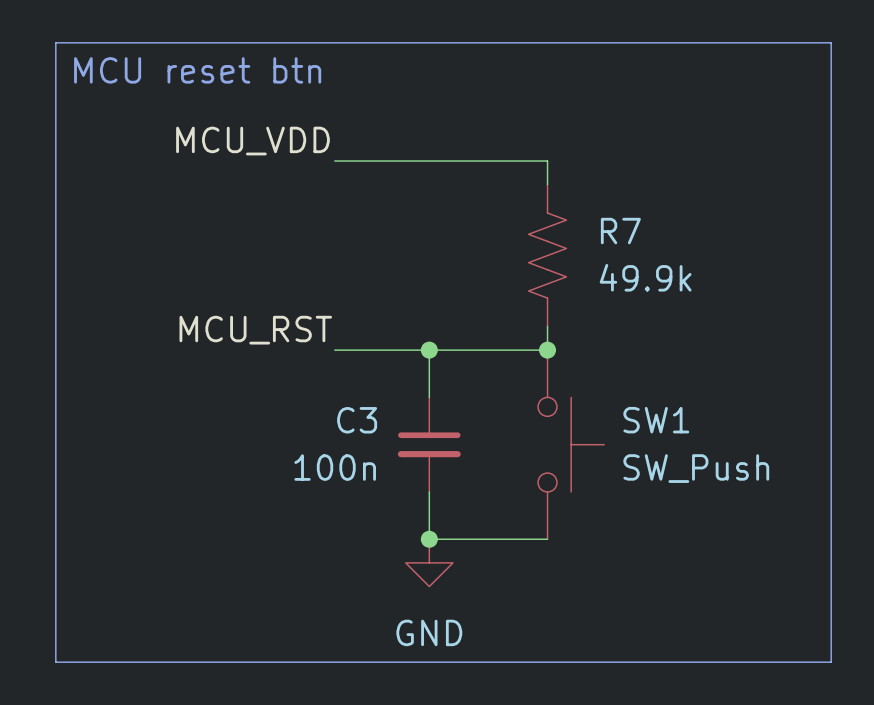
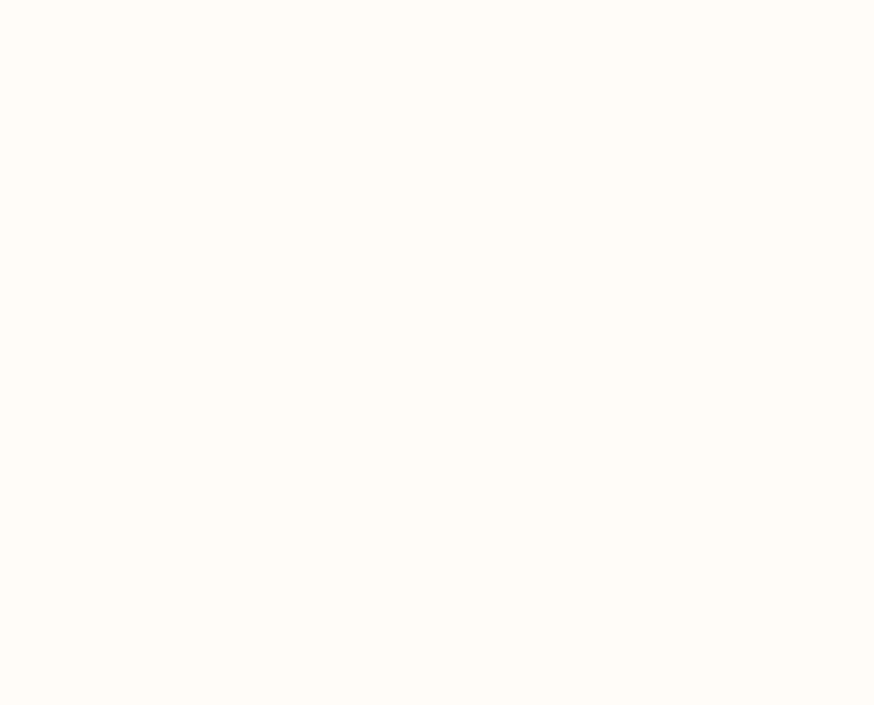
line: (55, 42) (831, 42) (831, 662) (55, 662) (55, 42) -> none
text: MCU reset btn (197, 70) -> none
label: MCU_VDD (252, 141) -> none
wire: (334, 161) (547, 161) (547, 184) -> none
R7: 49.9k (547, 255) -> none
wire: (547, 326) (547, 350) (334, 350) -> none
label: MCU_RST (255, 330) -> none
wire: (429, 350) (429, 397) -> none
junction: (429, 350) -> none
junction: (547, 350) -> none
C3: 100n (429, 444) -> none
SW1: SW_Push (571, 444) -> none
wire: (429, 491) (429, 539) (547, 539) -> none
junction: (429, 539) -> none
power symbol: GND (429, 562) -> none

